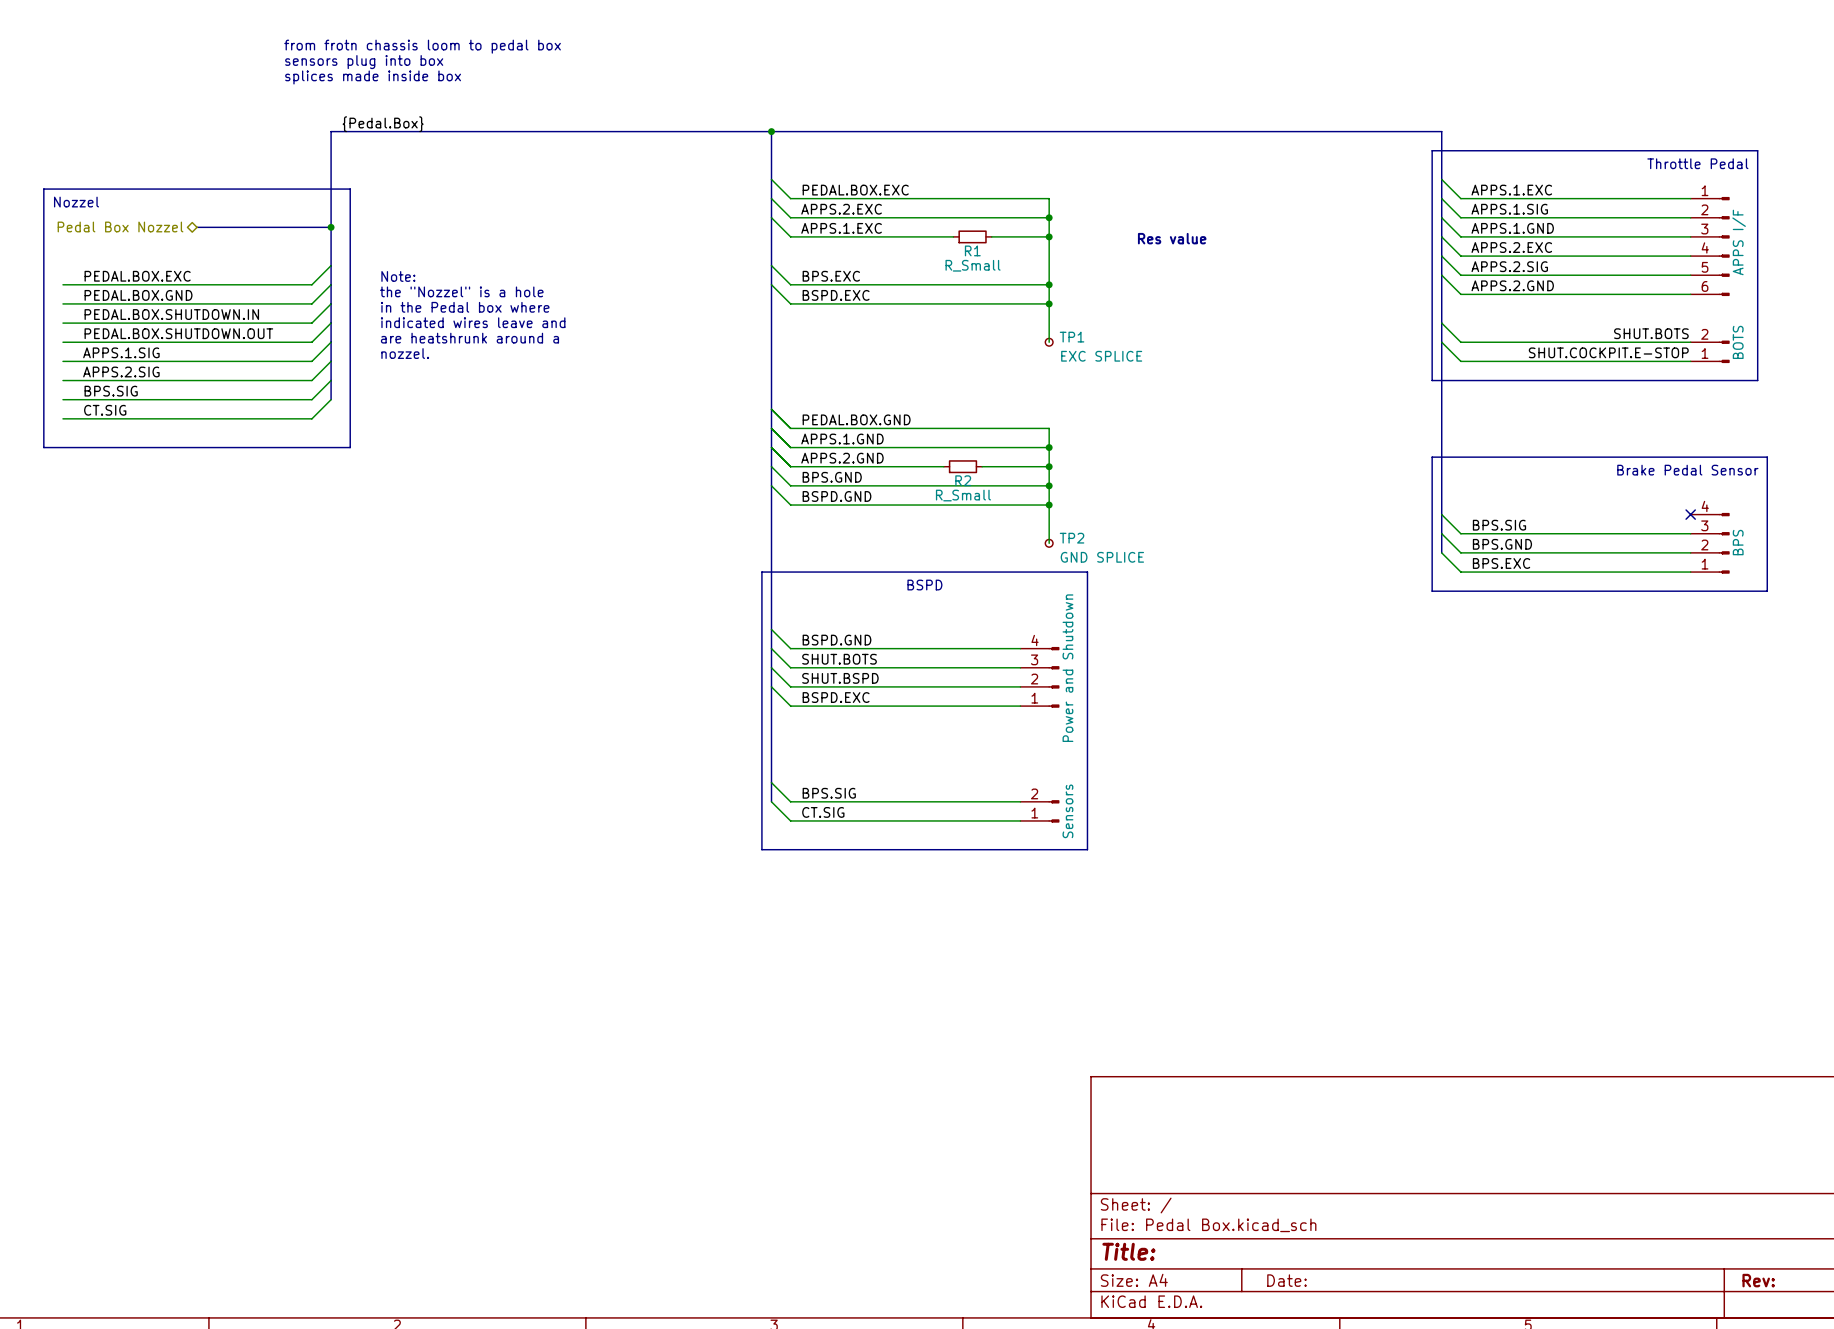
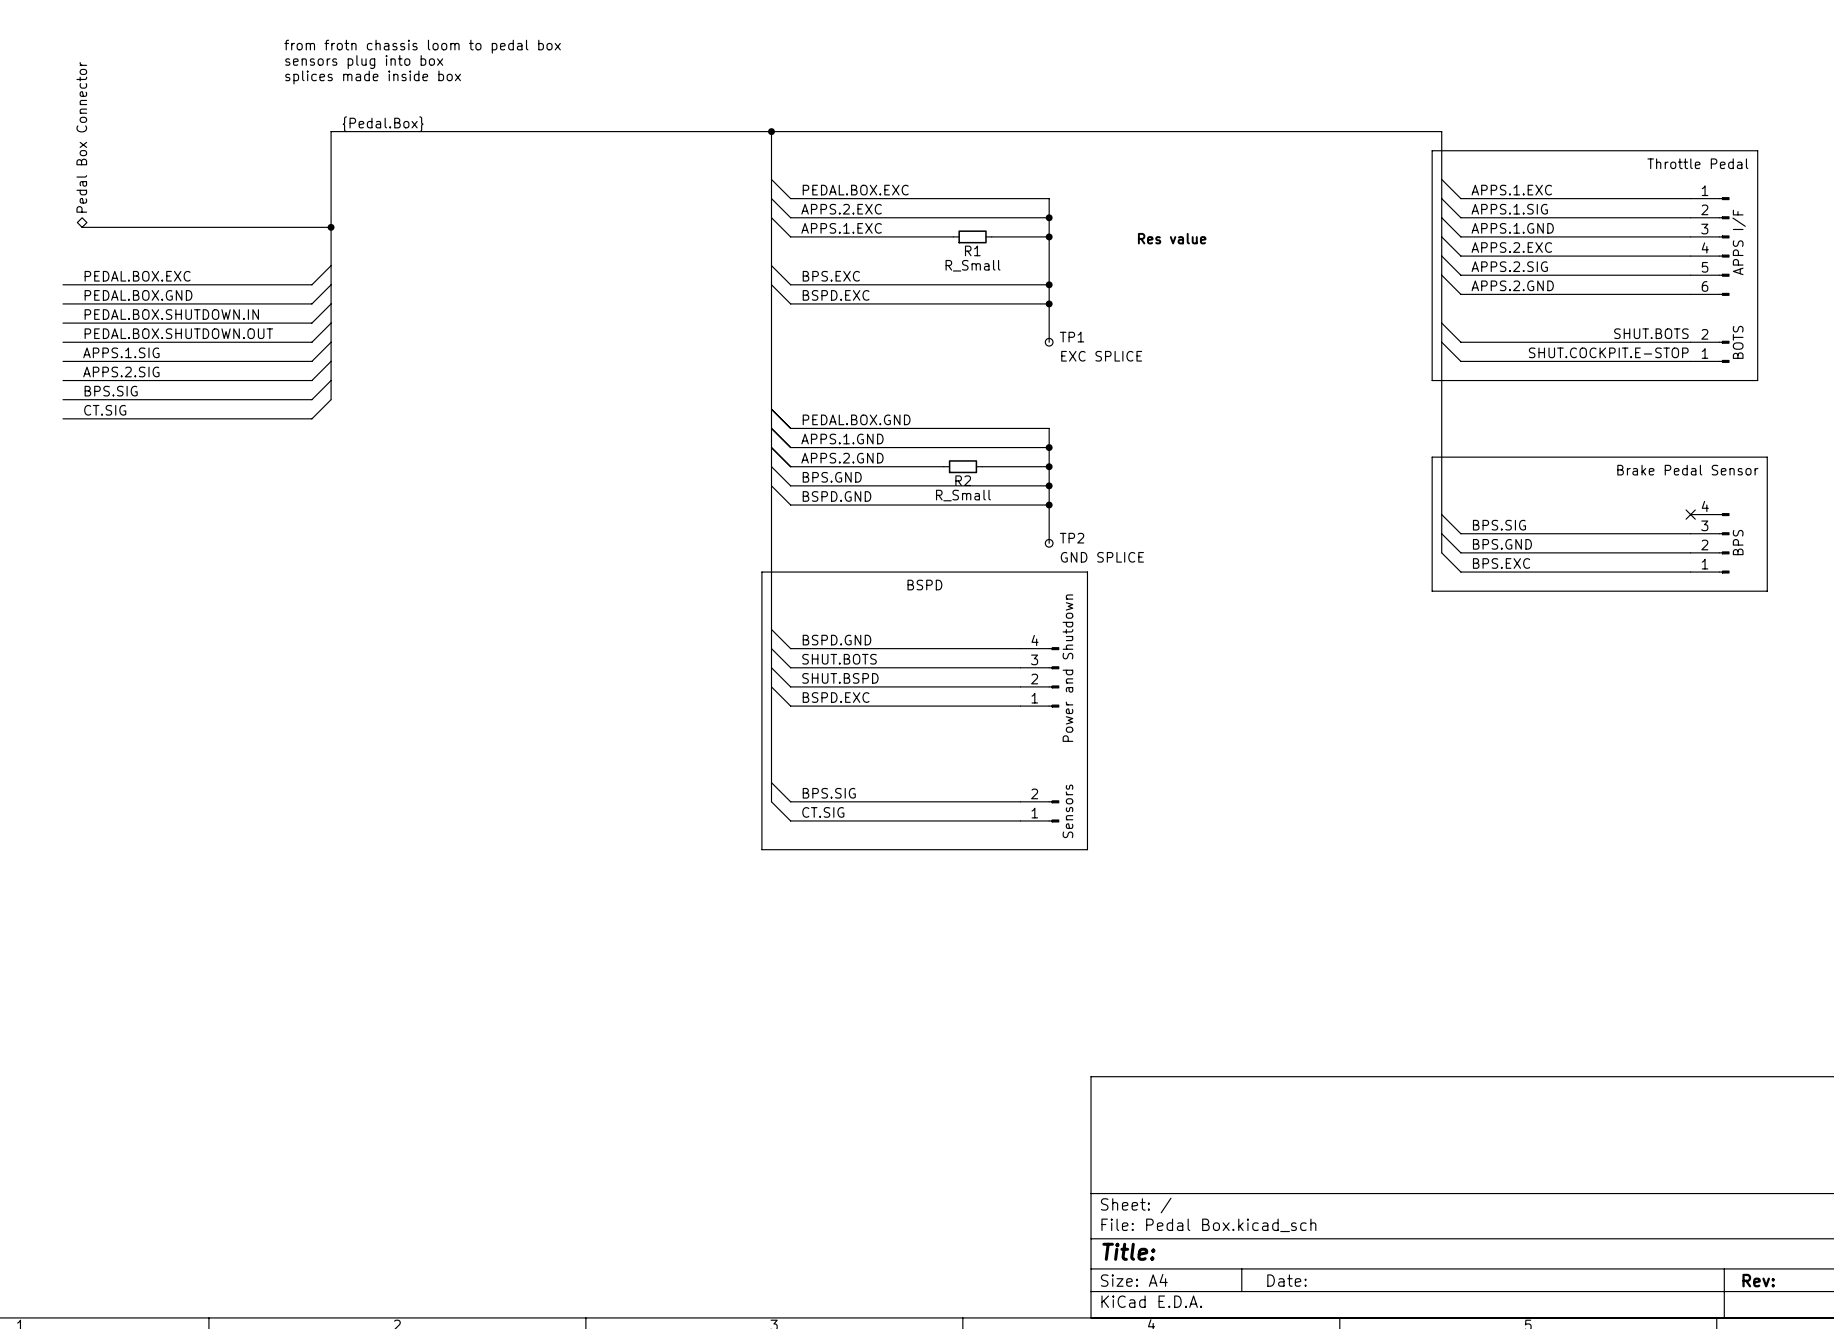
hierarchical label: none -> Pedal Box Connector (81, 137)
line: (43, 189) (350, 189) (350, 447) (43, 447) (43, 189) -> none
text: Nozzel (76, 202) -> none
hierarchical label: Pedal Box Nozzel (120, 226) -> none
bus: none -> (82, 227) (197, 227)
text: Note: (398, 276) -> none
text: the "Nozzel" is a hole (461, 291) -> none
text: in the Pedal box where (465, 307) -> none
text: indicated wires leave and (473, 322) -> none
text: are heatshrunk around a (469, 338) -> none
text: nozzel. (405, 353) -> none

